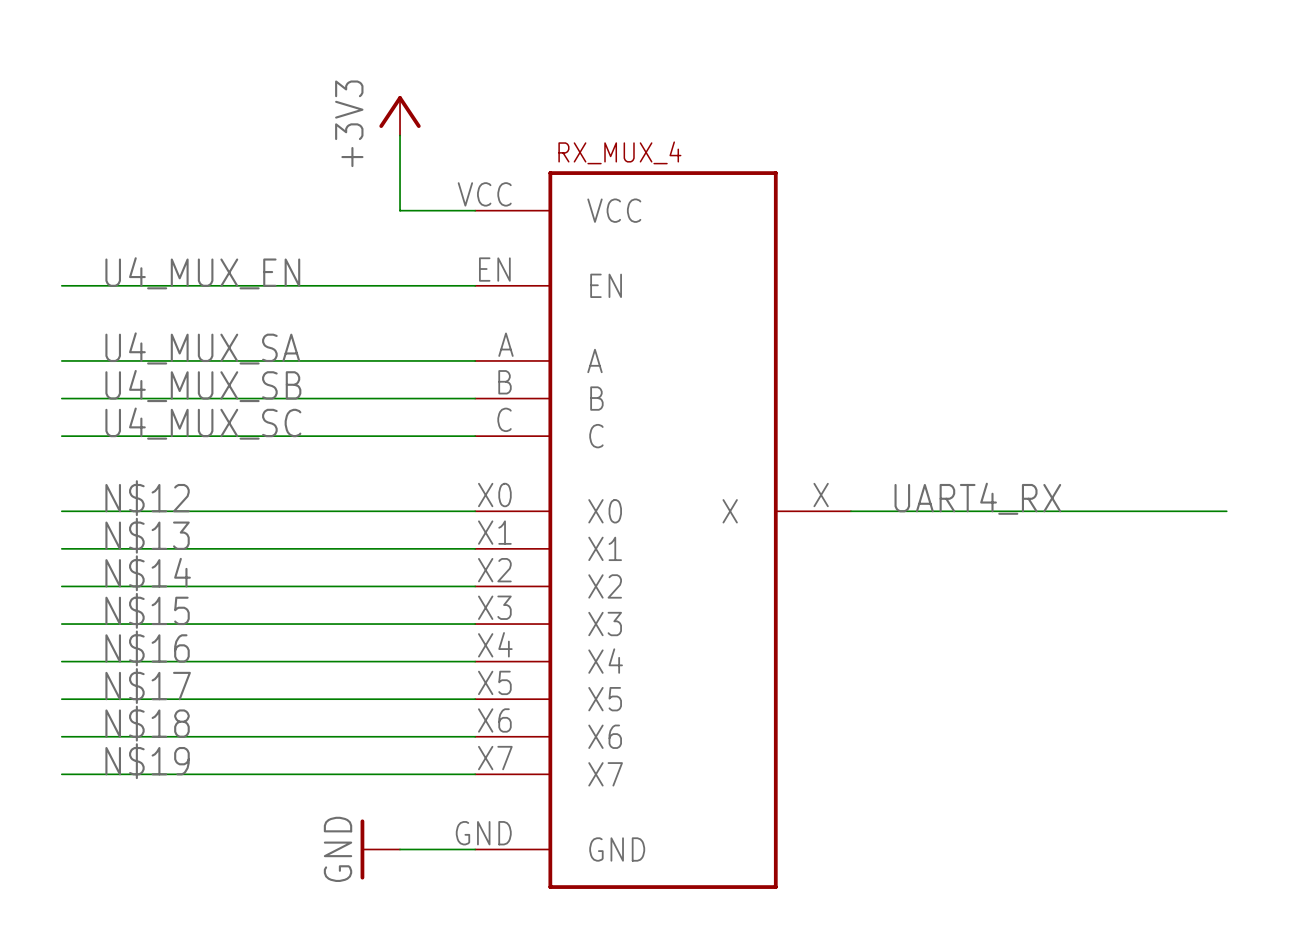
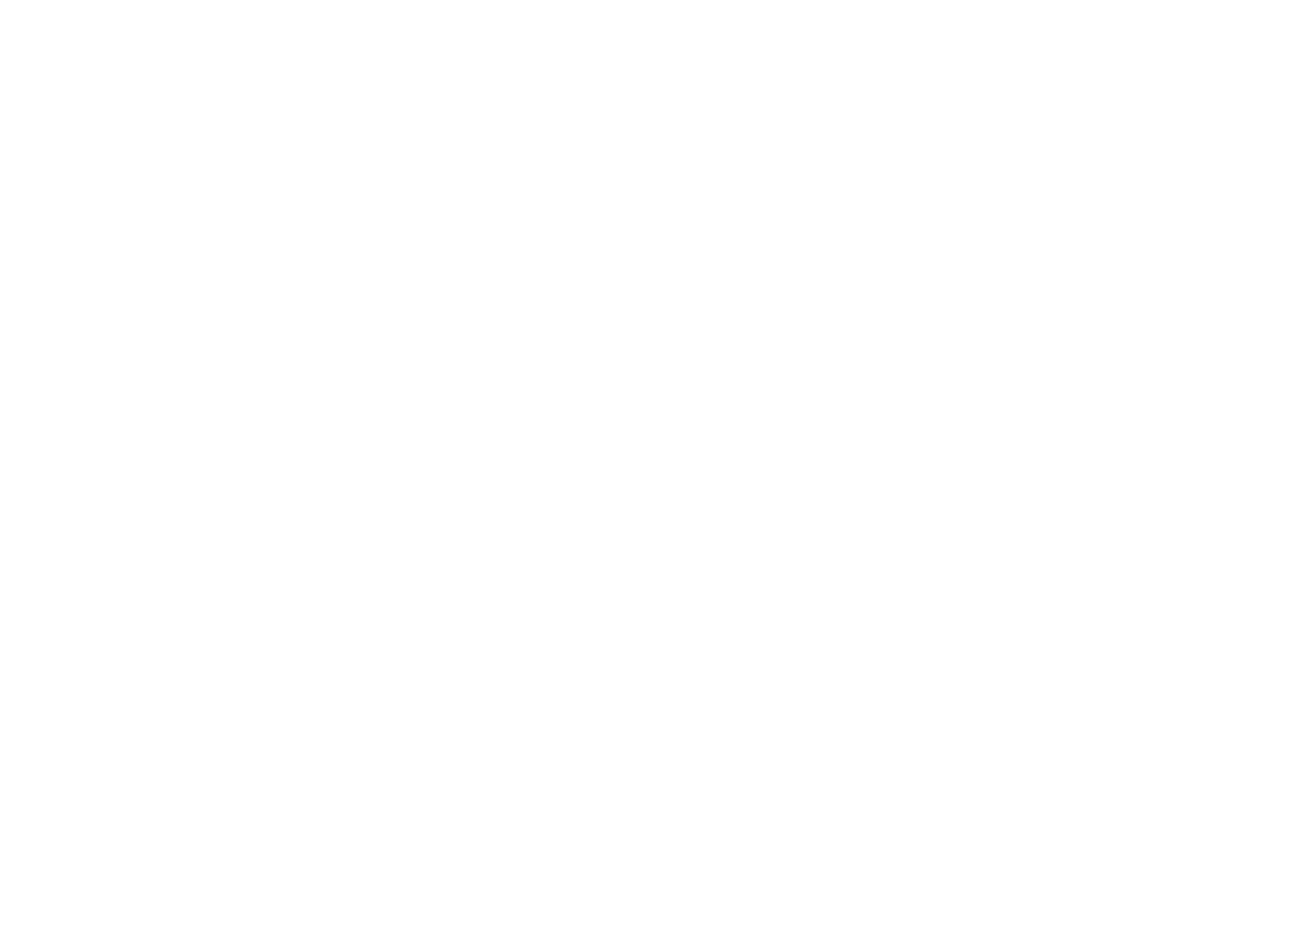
power symbol: +3V3 (400, 115) -> none
wire: (400, 135) (400, 210) (475, 210) -> none
label: U4_MUX_EN (202, 273) -> none
wire: (61, 285) (475, 285) -> none
label: U4_MUX_SA (202, 348) -> none
wire: (61, 360) (475, 360) -> none
label: U4_MUX_SB (203, 386) -> none
wire: (61, 398) (475, 398) -> none
label: U4_MUX_SC (203, 423) -> none
wire: (61, 436) (475, 436) -> none
label: N$12 (147, 498) -> none
label: UART4_RX (977, 498) -> none
wire: (61, 511) (475, 511) -> none
wire: (850, 511) (1226, 511) -> none
RX_MUX_4: (663, 530) -> none
label: N$13 (147, 535) -> none
wire: (61, 548) (475, 548) -> none
label: N$14 (148, 573) -> none
wire: (61, 586) (475, 586) -> none
label: N$15 (147, 610) -> none
wire: (61, 624) (475, 624) -> none
label: N$16 (147, 648) -> none
wire: (61, 661) (475, 661) -> none
label: N$17 (148, 686) -> none
wire: (61, 699) (475, 699) -> none
label: N$18 (147, 723) -> none
wire: (61, 736) (475, 736) -> none
label: N$19 (147, 761) -> none
wire: (61, 774) (475, 774) -> none
power symbol: GND (380, 849) -> none
wire: (400, 849) (475, 849) -> none

